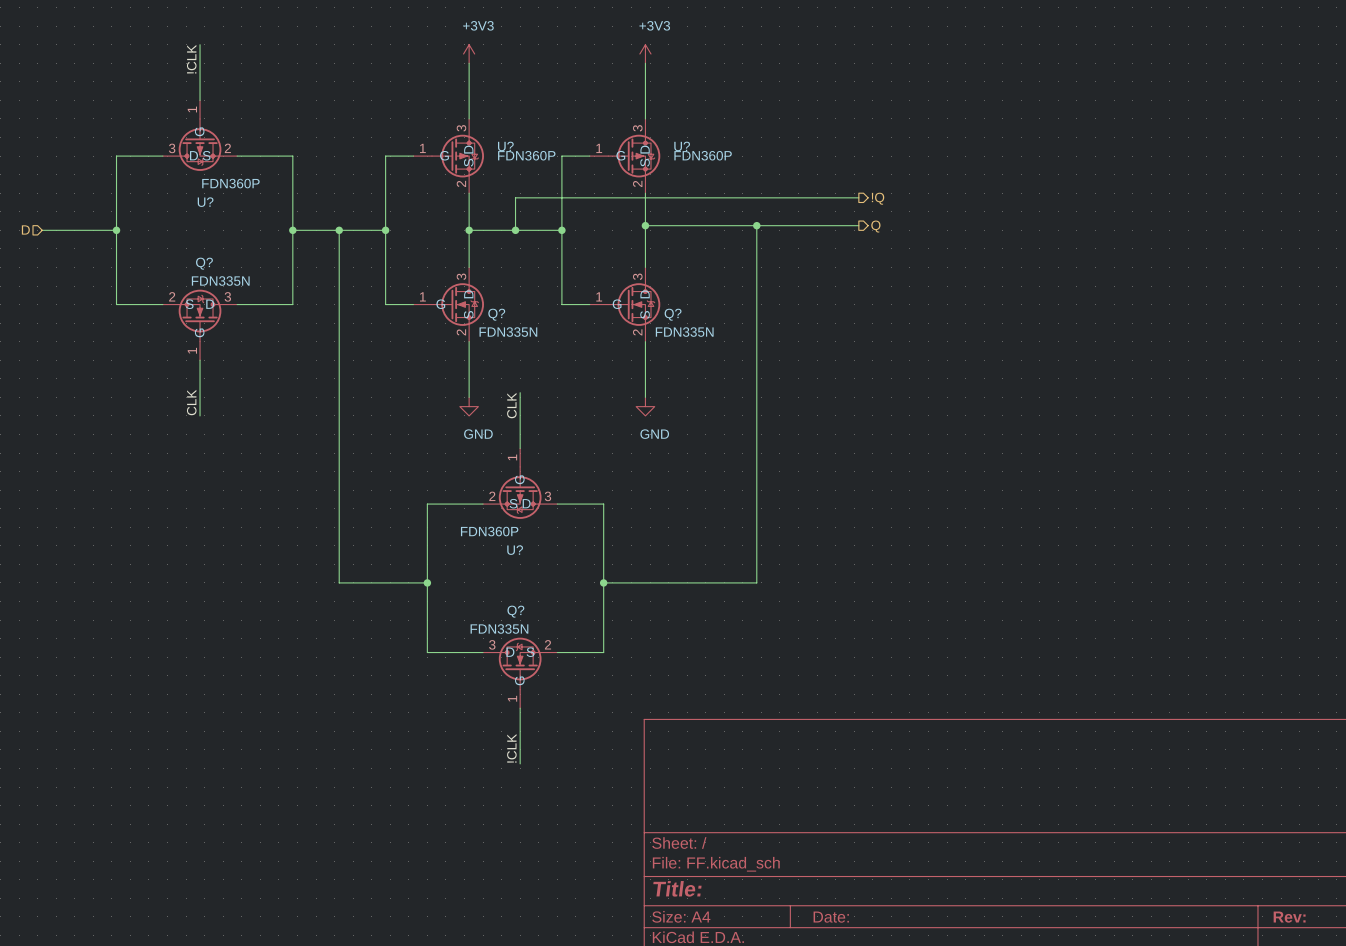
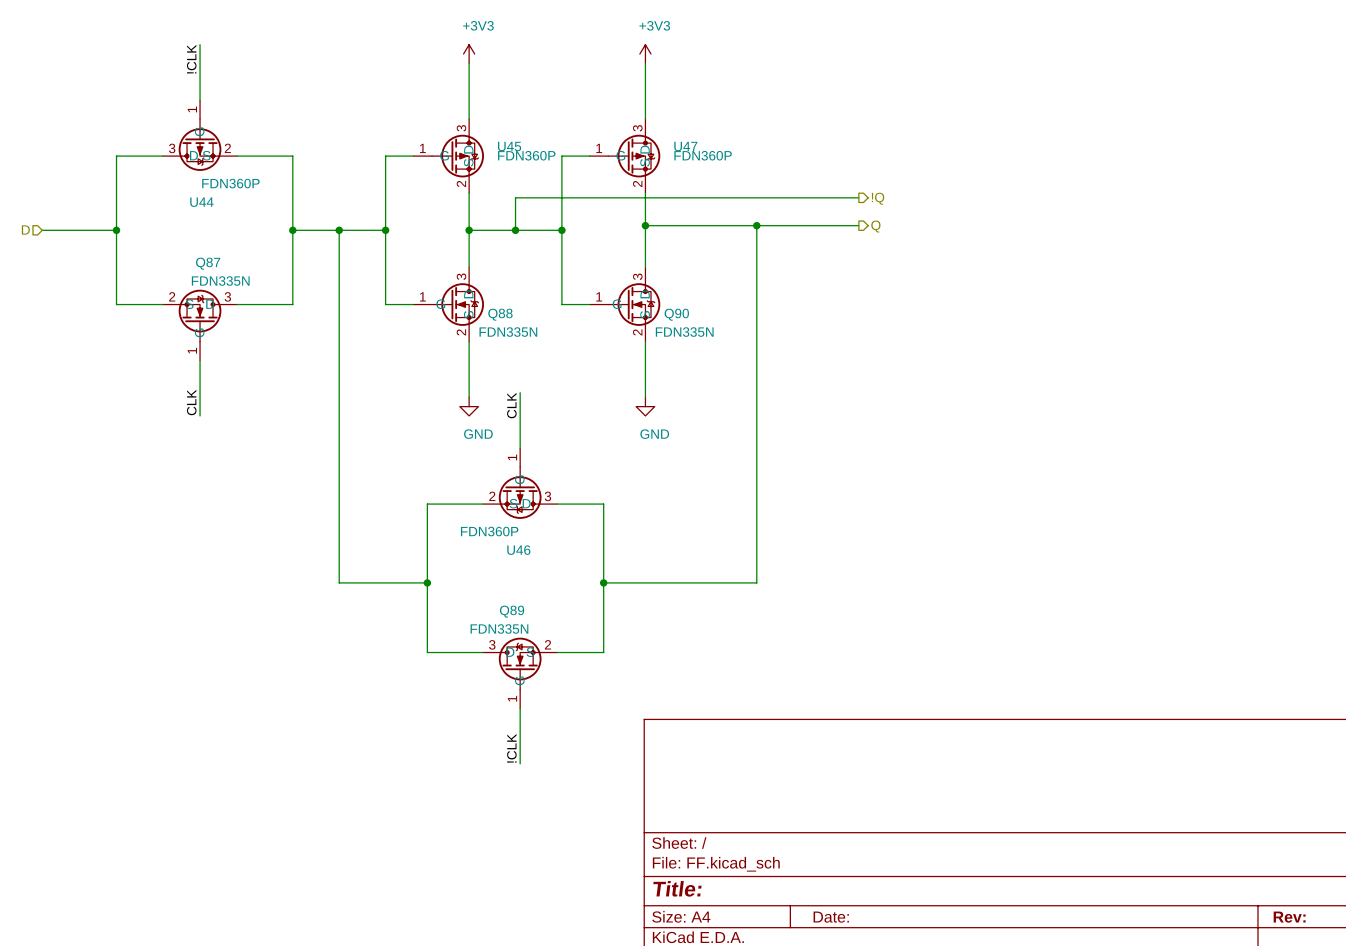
U? name: U? (505, 146) -> U45 (509, 146)
U? name: U? (682, 146) -> U47 (685, 146)
U? name: U? (205, 202) -> U44 (201, 202)
Q? name: Q? (204, 263) -> Q87 (208, 263)
Q? name: Q? (496, 314) -> Q88 (500, 314)
Q? name: Q? (673, 314) -> Q90 (676, 314)
U? name: U? (515, 550) -> U46 (518, 550)
Q? name: Q? (515, 611) -> Q89 (512, 611)

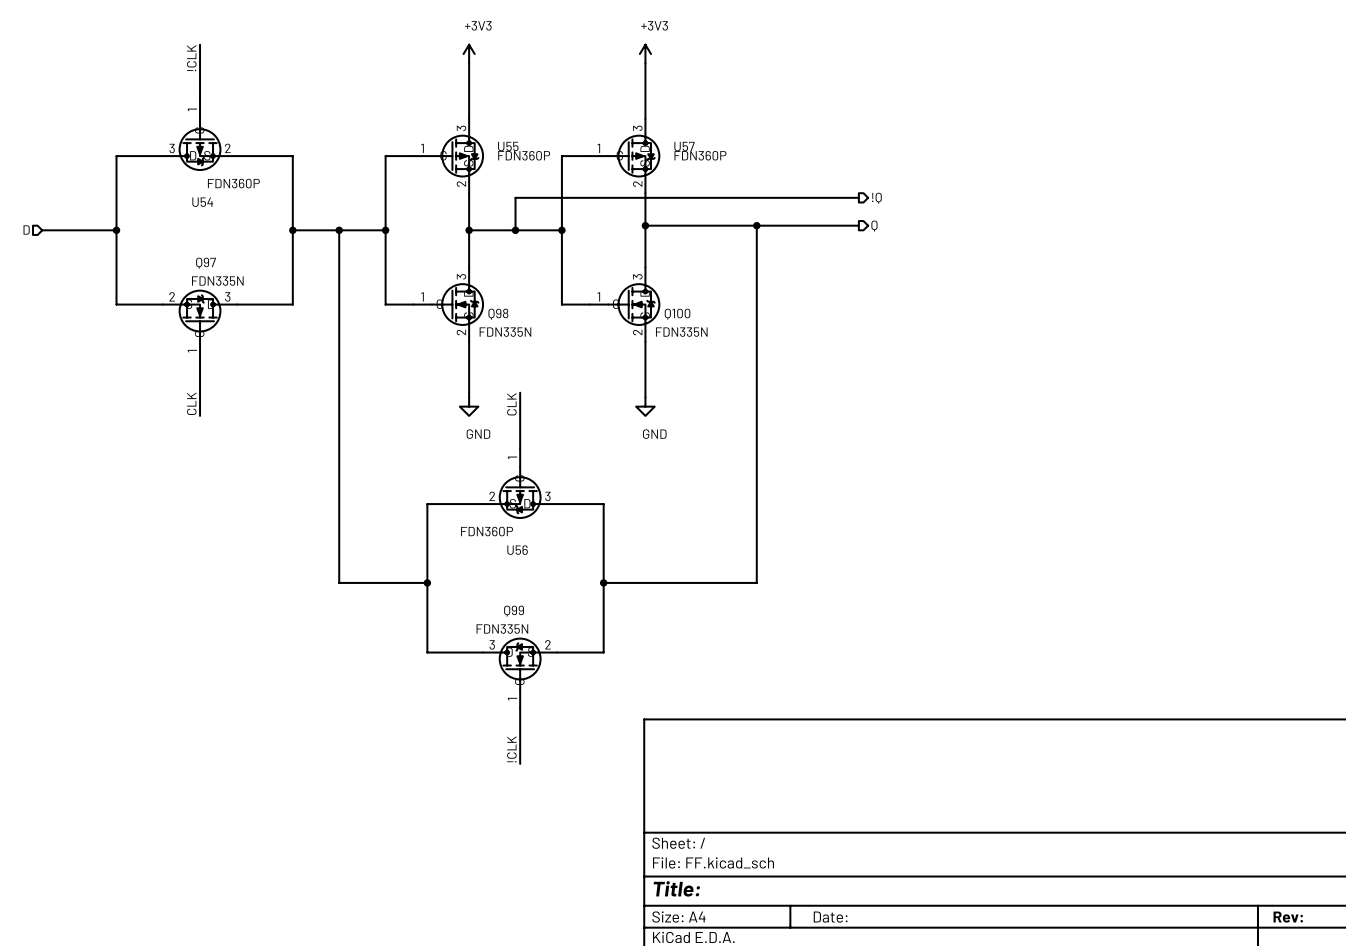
U45 name: U45 (509, 146) -> U55 (508, 146)
U47 name: U47 (685, 146) -> U57 (684, 146)
U44 name: U44 (201, 202) -> U54 (202, 202)
Q87 name: Q87 (208, 263) -> Q97 (206, 263)
Q88 name: Q88 (500, 314) -> Q98 (498, 314)
Q90 name: Q90 (676, 314) -> Q100 (677, 314)
U46 name: U46 (518, 550) -> U56 (517, 550)
Q89 name: Q89 (512, 611) -> Q99 (514, 611)

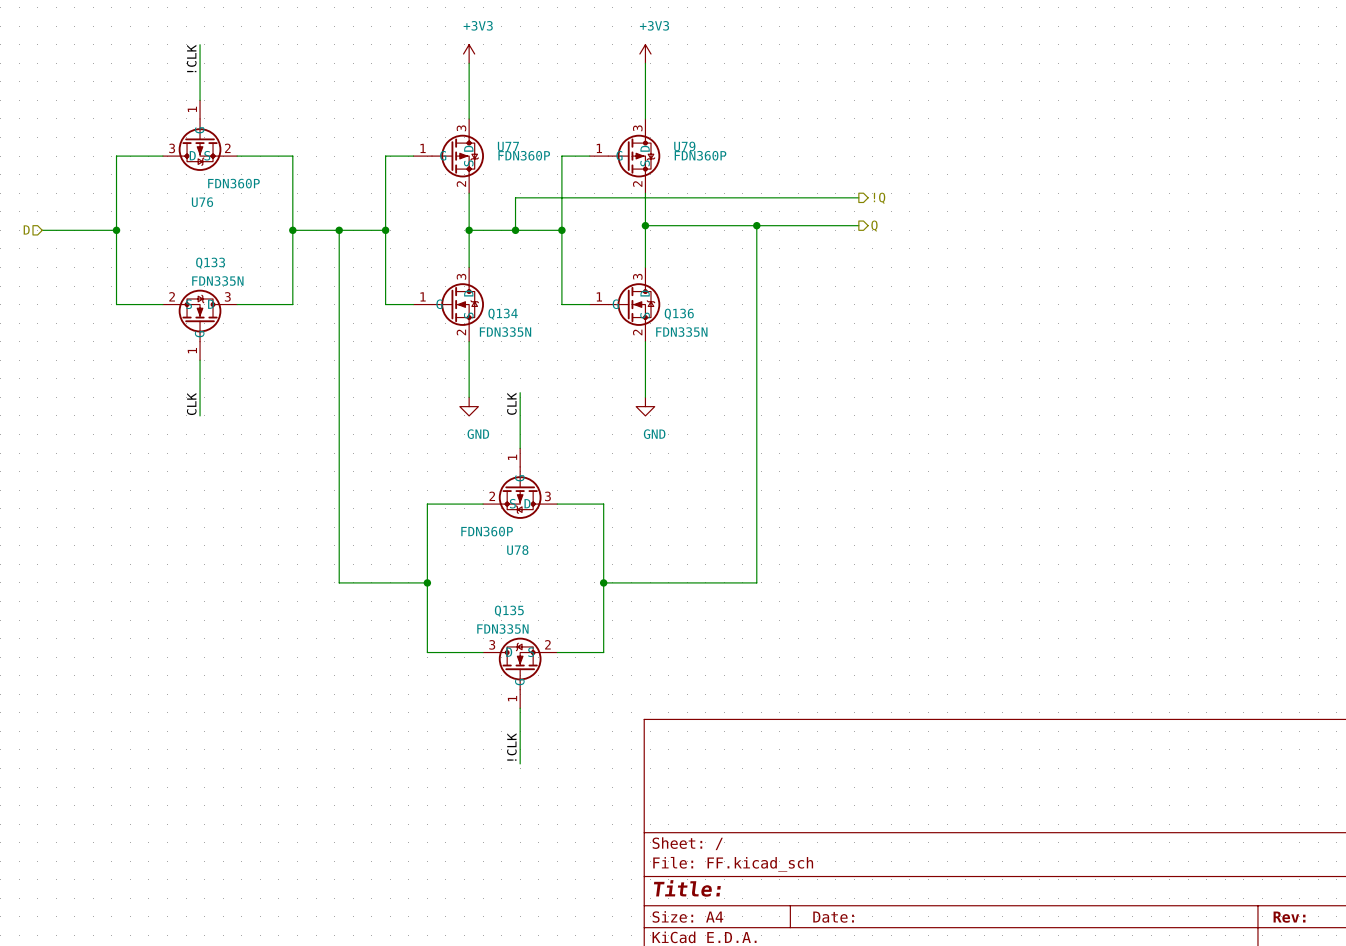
U55 name: U55 (508, 146) -> U77 (508, 146)
U57 name: U57 (684, 146) -> U79 (684, 146)
U54 name: U54 (202, 202) -> U76 (202, 202)
Q97 name: Q97 (206, 263) -> Q133 (210, 263)
Q98 name: Q98 (498, 314) -> Q134 (503, 314)
Q100 name: Q100 (677, 314) -> Q136 (679, 314)
U56 name: U56 (517, 550) -> U78 (517, 550)
Q99 name: Q99 (514, 611) -> Q135 (509, 611)

